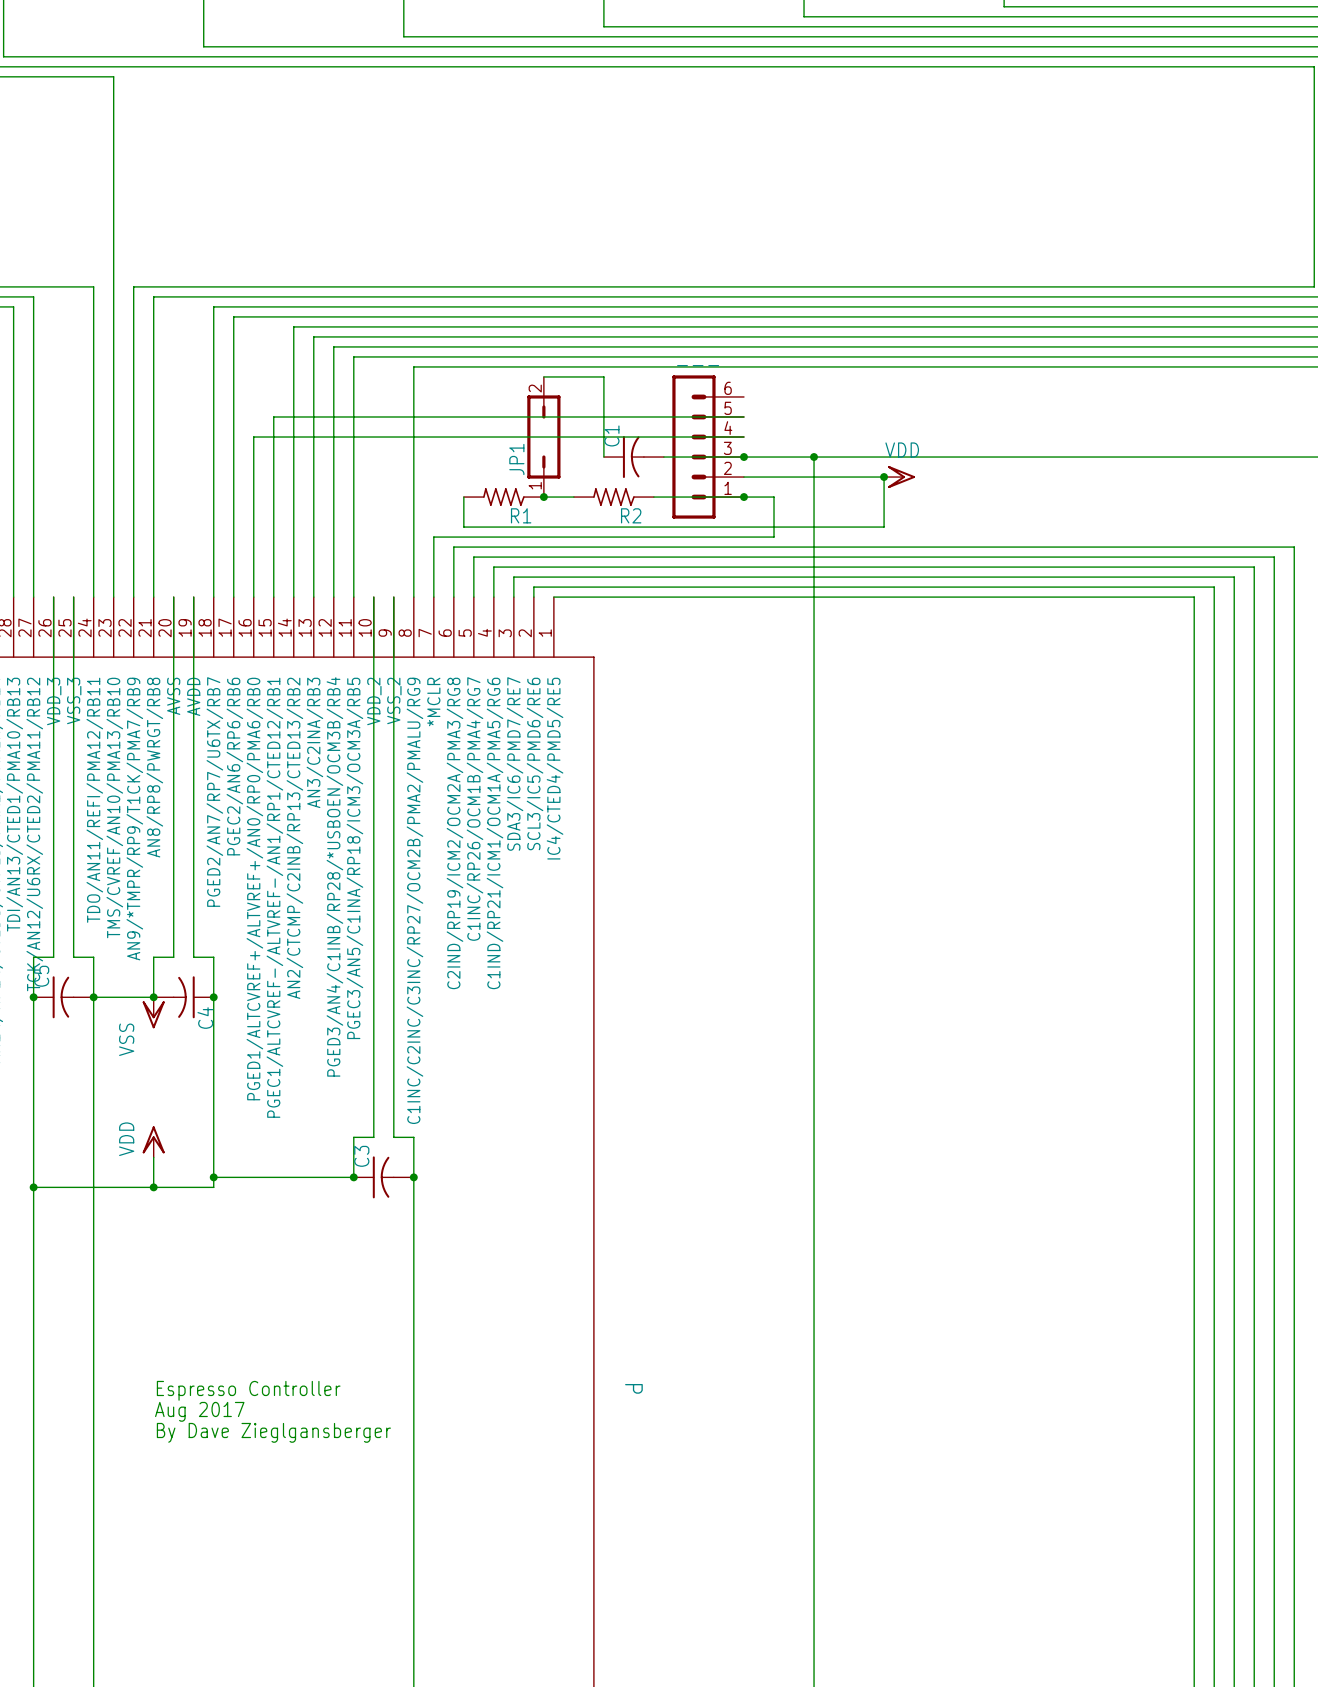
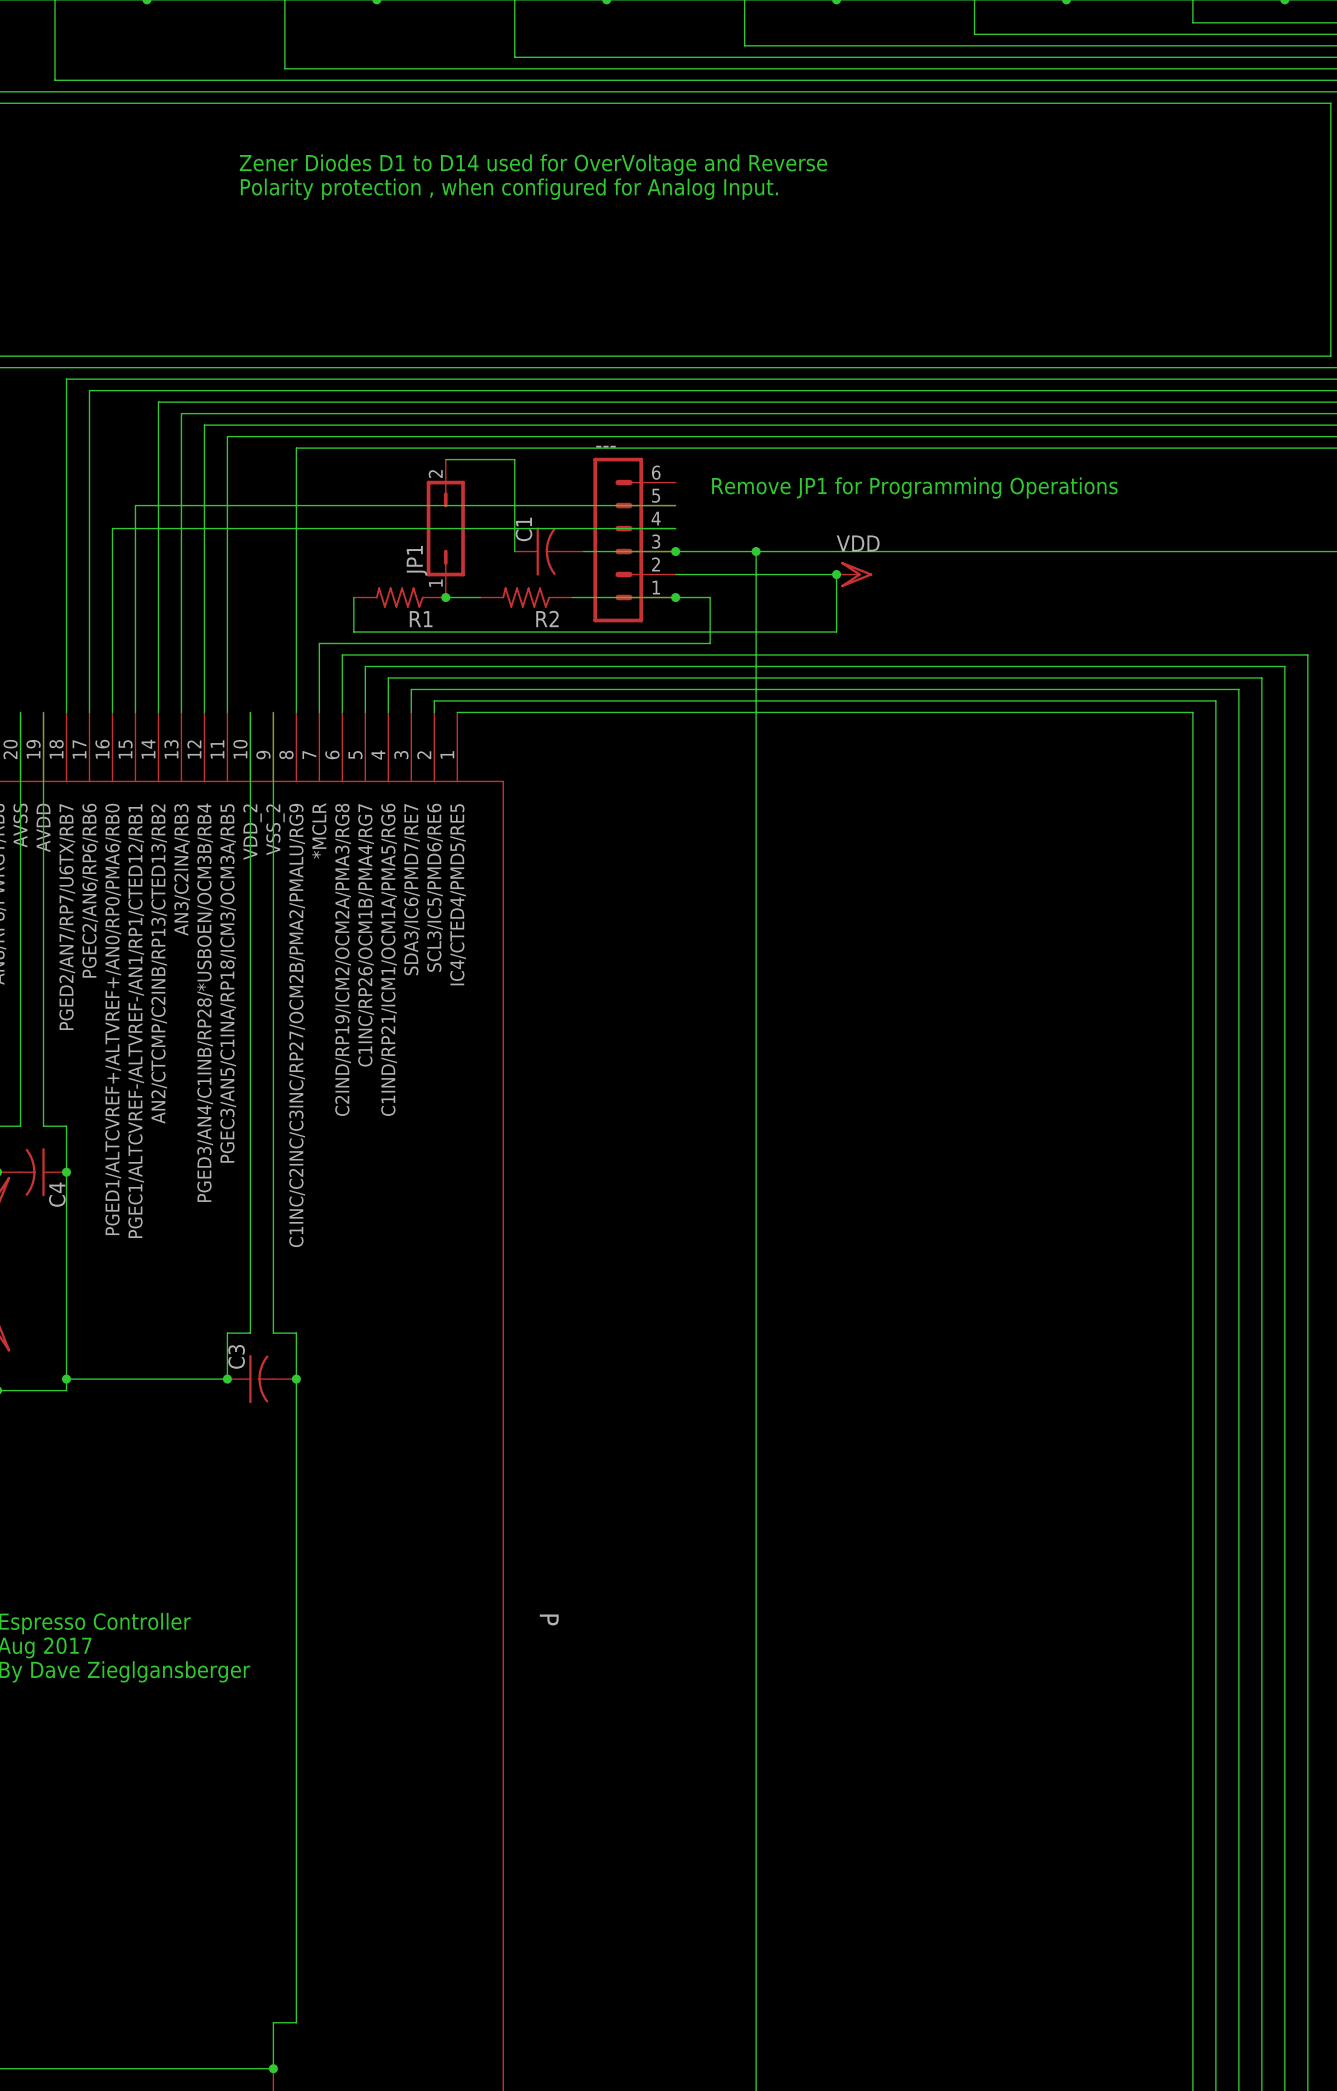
text: none -> Zener Diodes D1 to D14 used for OverVoltage and Reverse (533, 165)
text: none -> Polarity protection , when configured for Analog Input. (509, 189)
text: none -> Remove JP1 for Programming Operations (914, 487)

